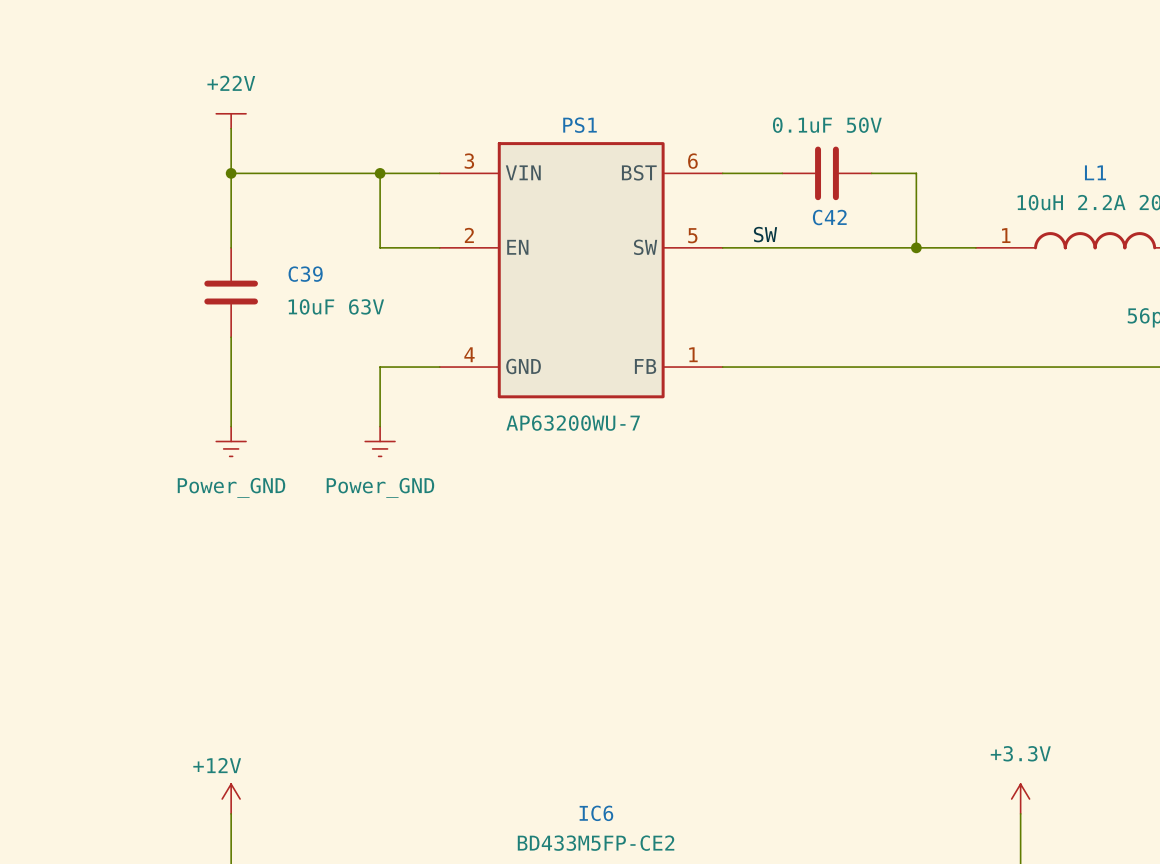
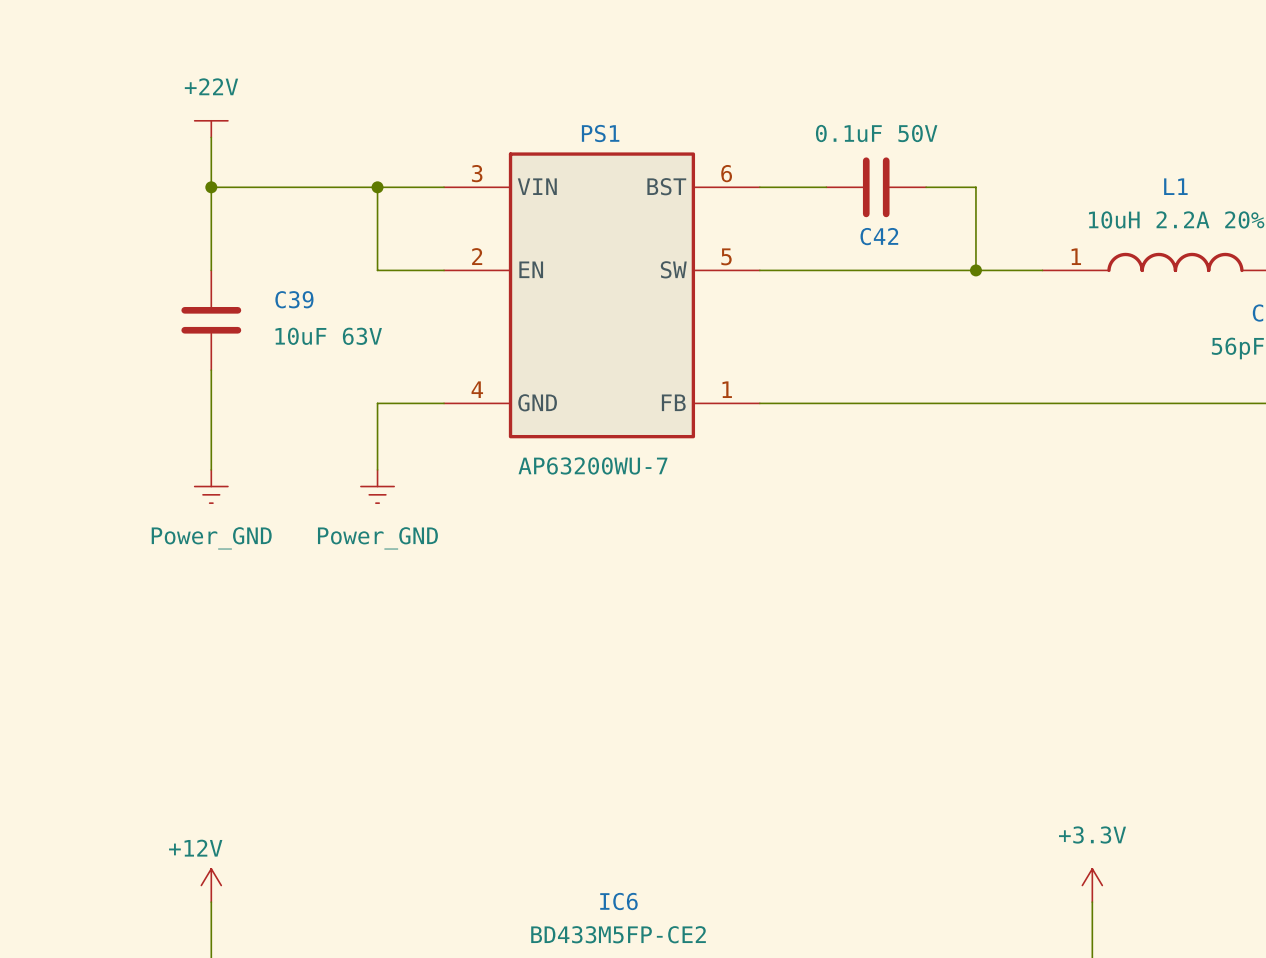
label: SW (765, 234) -> none

